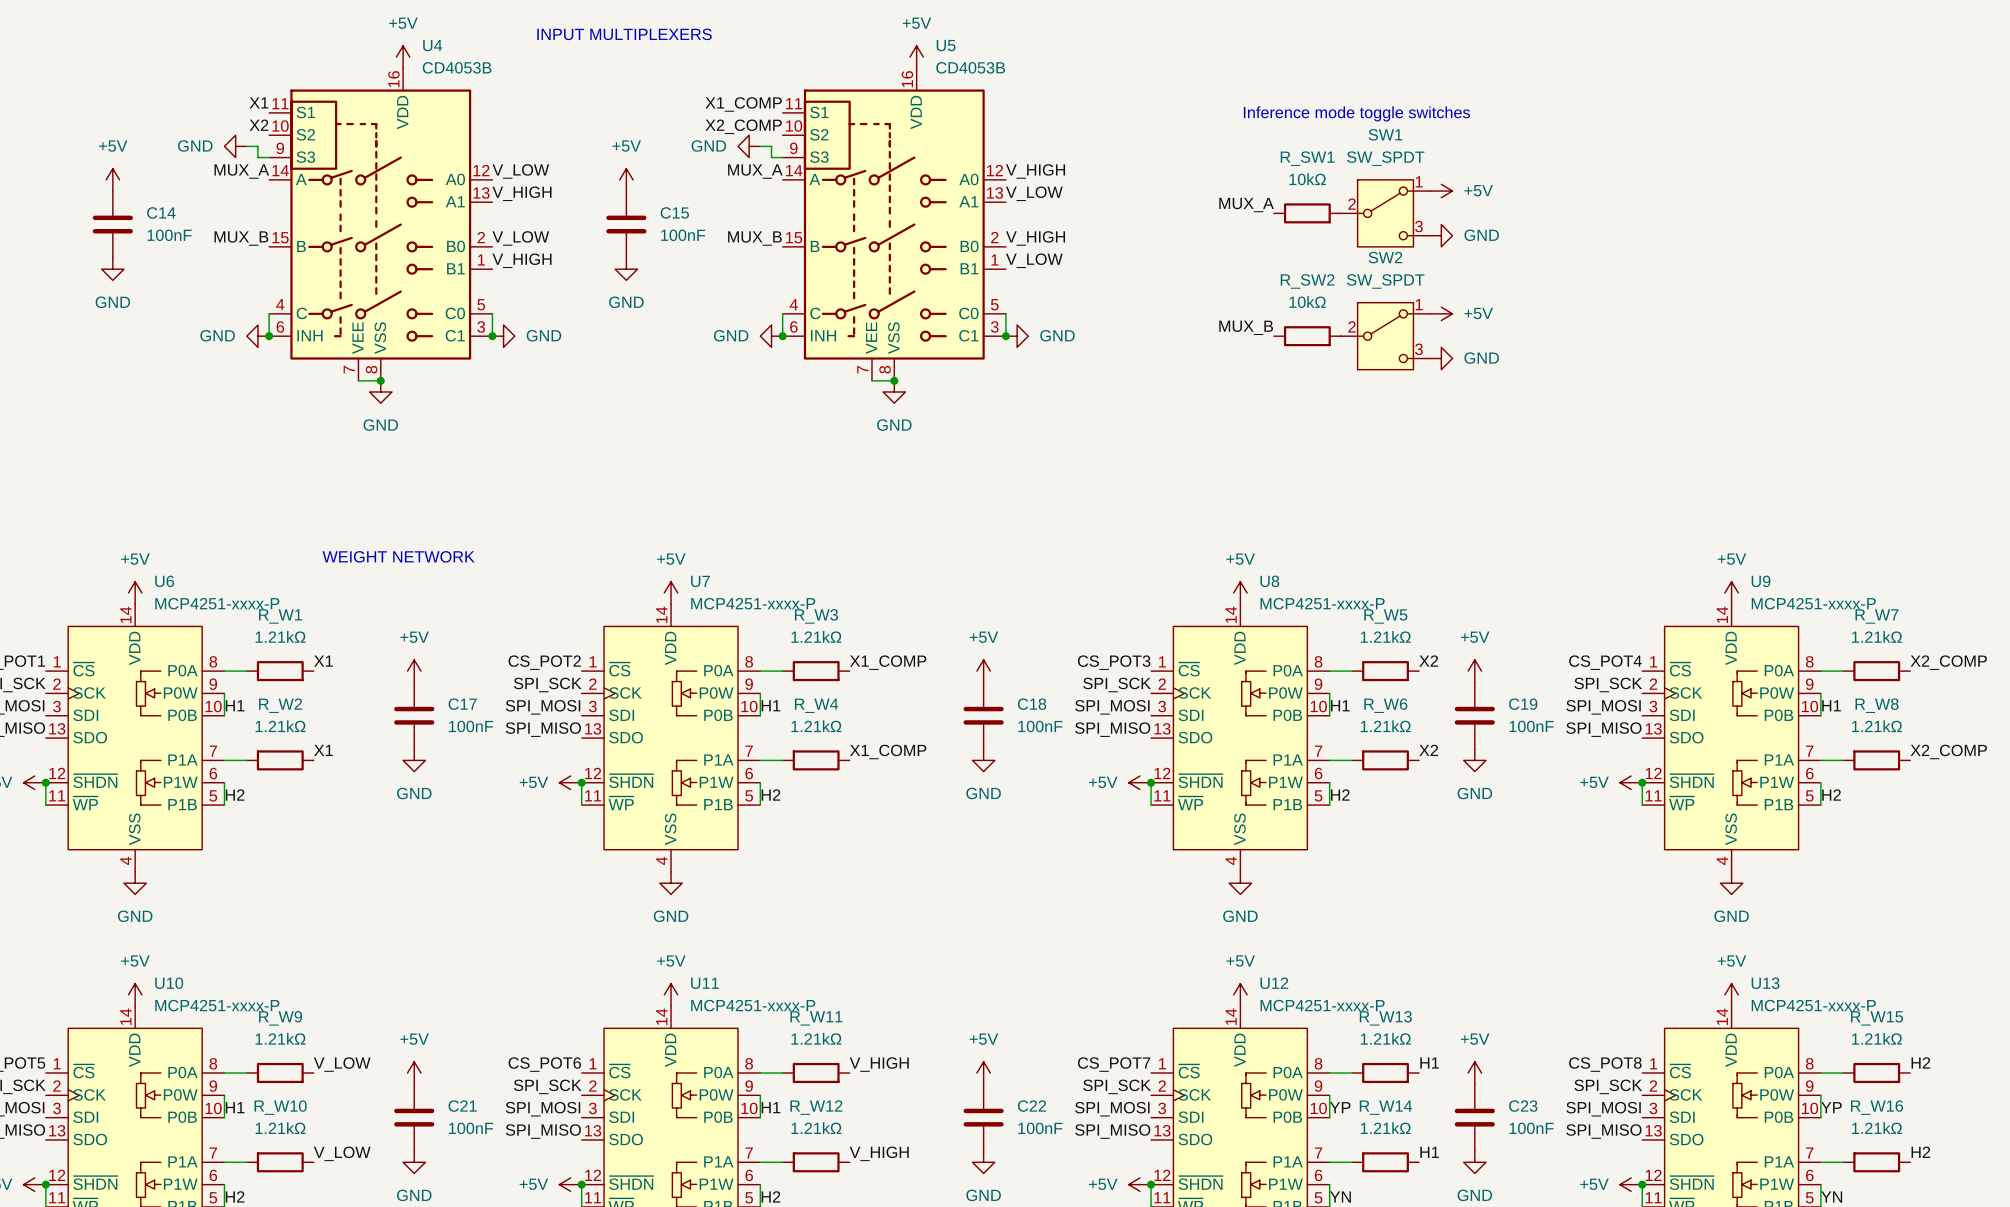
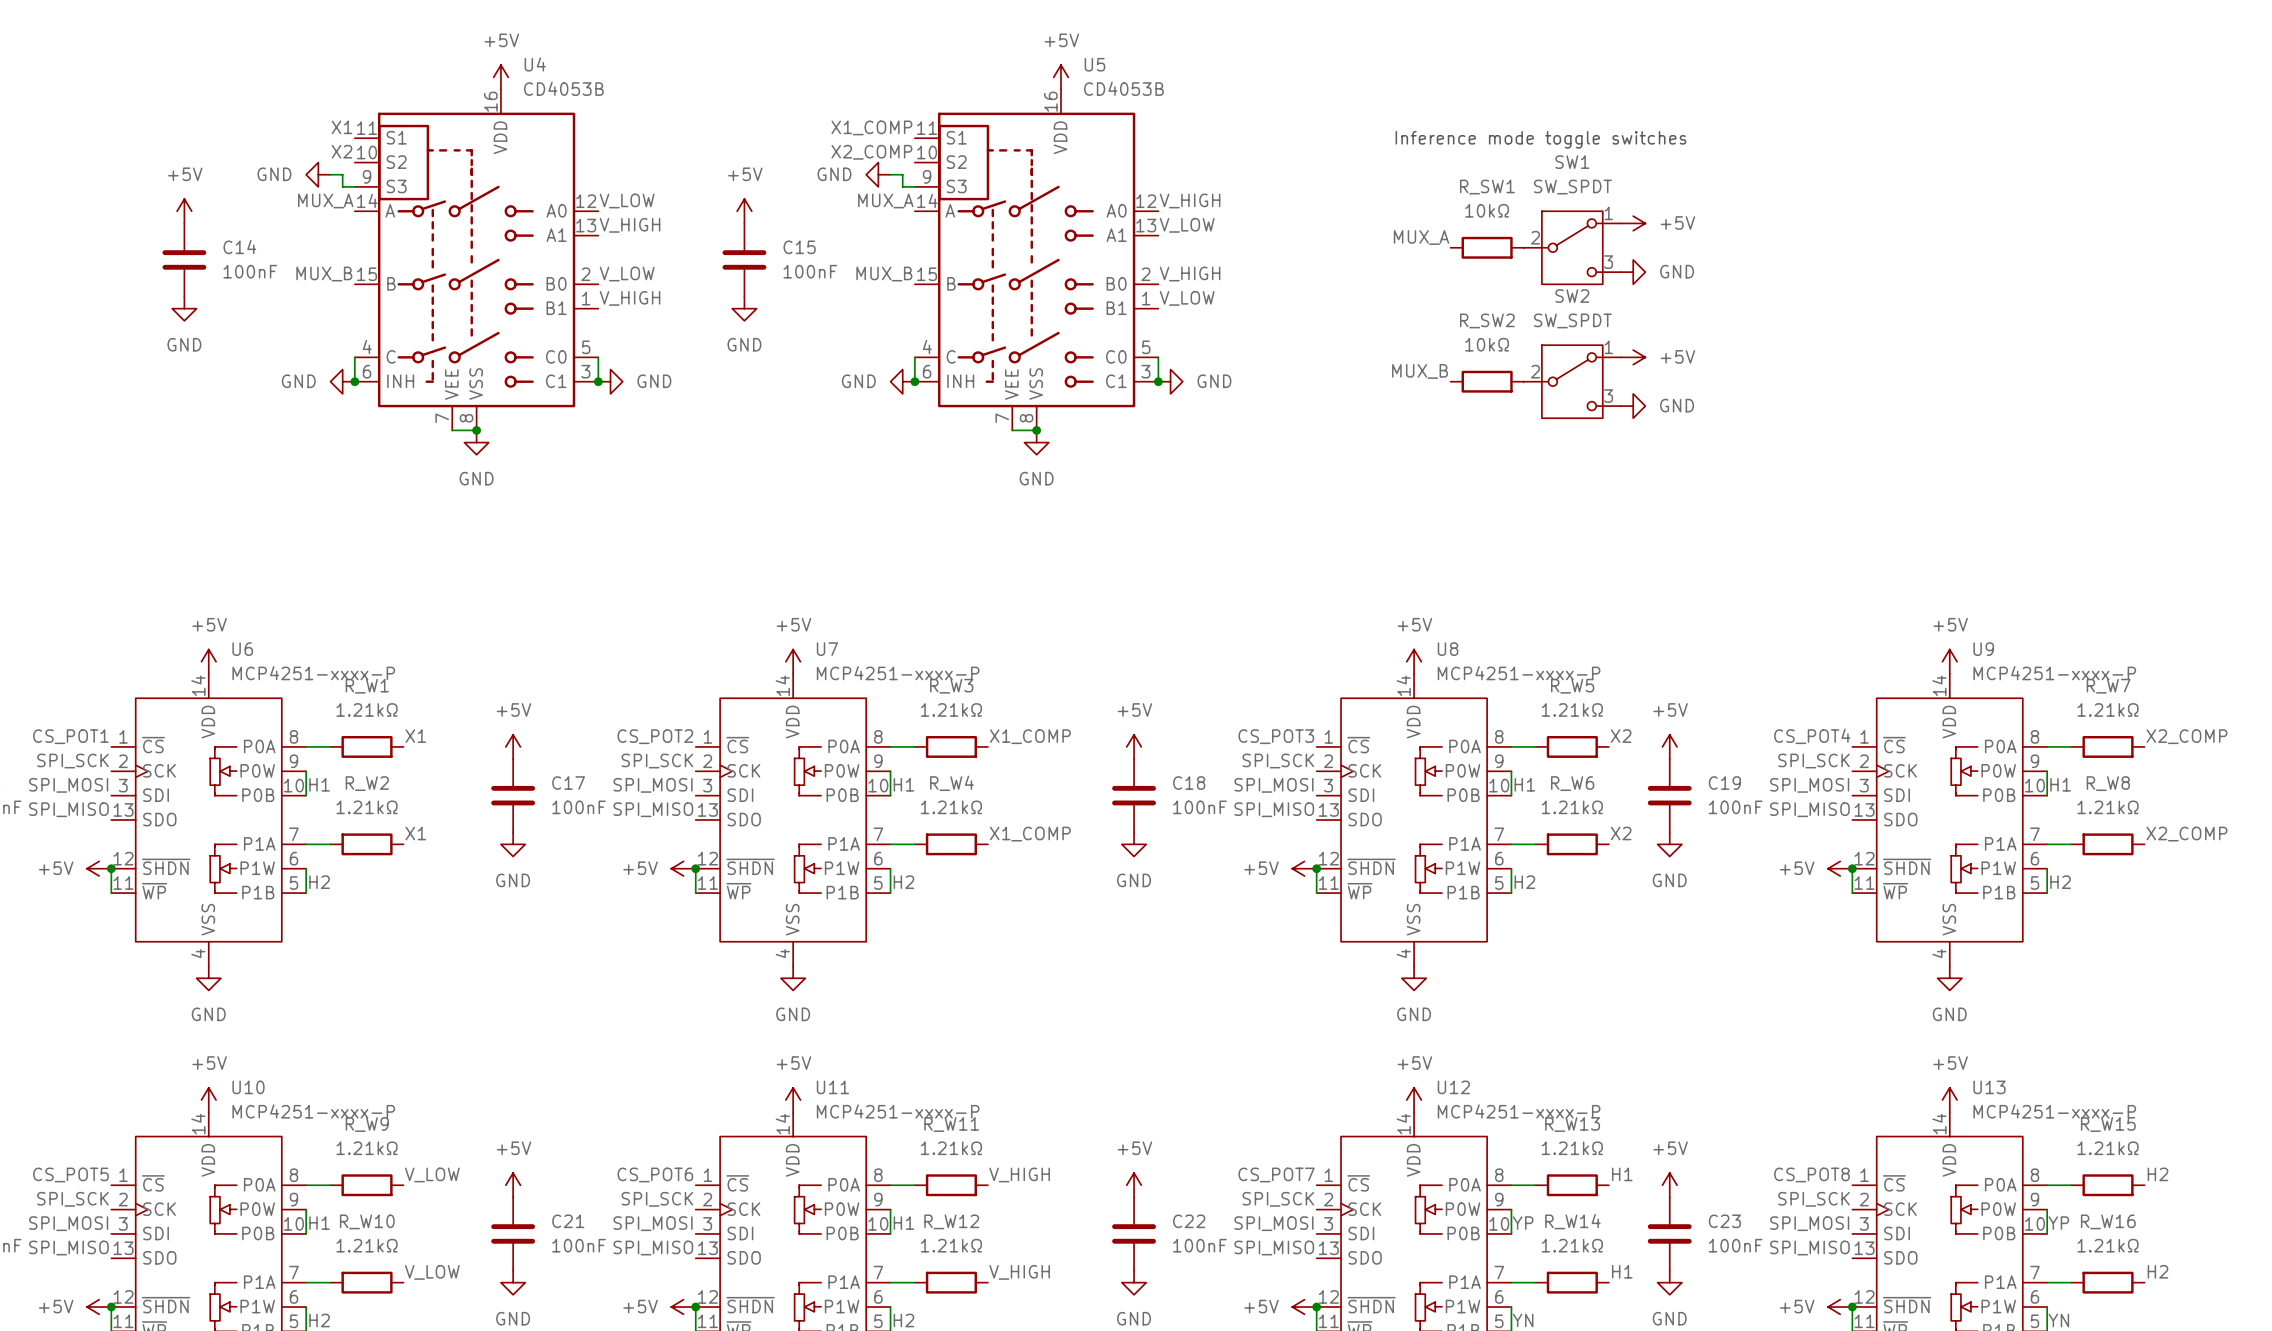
text: INPUT MULTIPLEXERS (624, 34) -> none
text: WEIGHT NETWORK (398, 556) -> none

